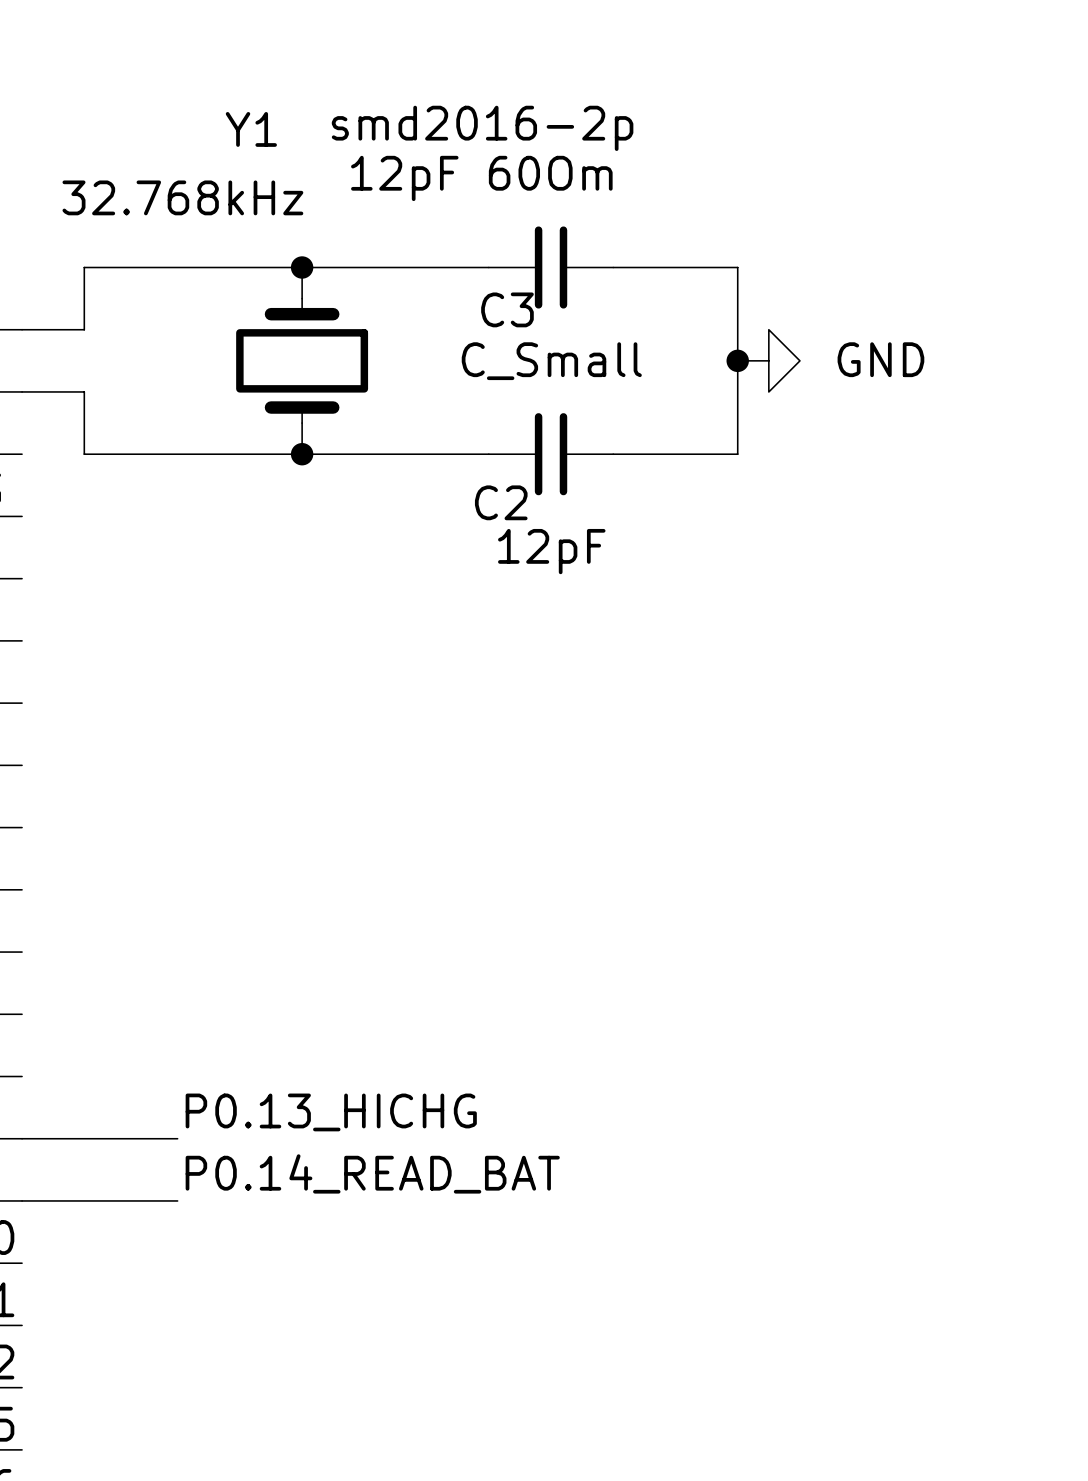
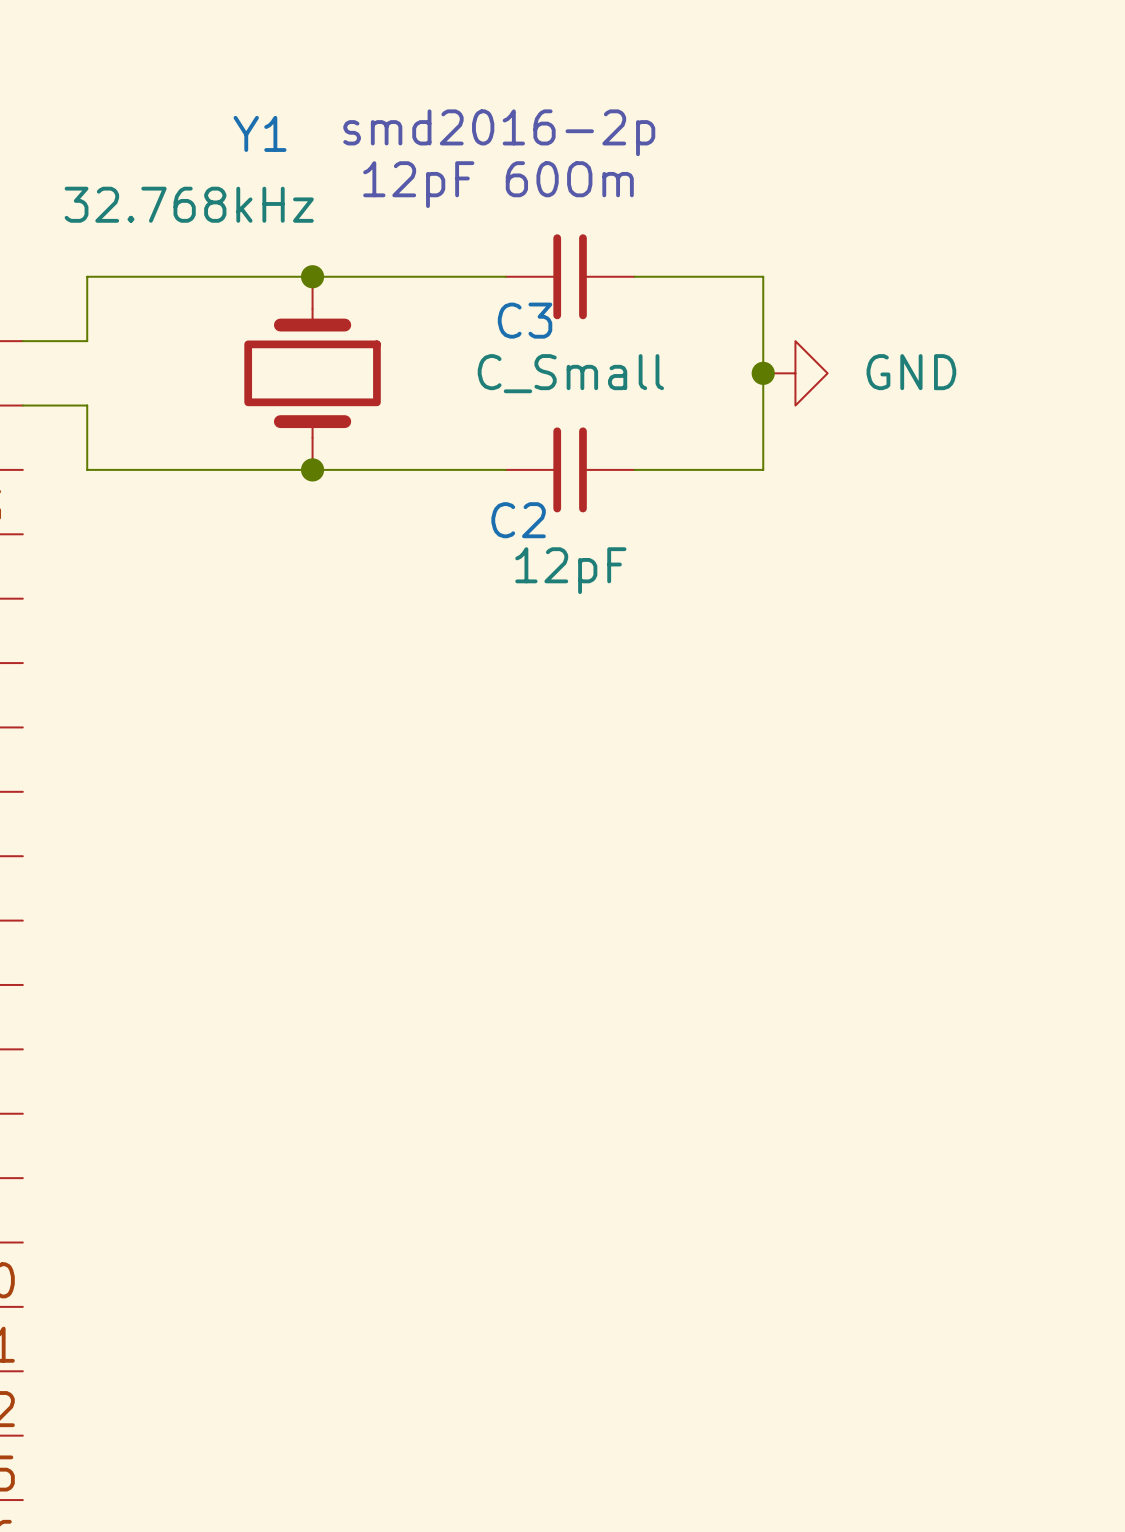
label: P0.13_HICHG (331, 1112) -> none
wire: (22, 1138) (177, 1138) -> none
label: P0.14_READ_BAT (372, 1173) -> none
wire: (22, 1200) (177, 1200) -> none

